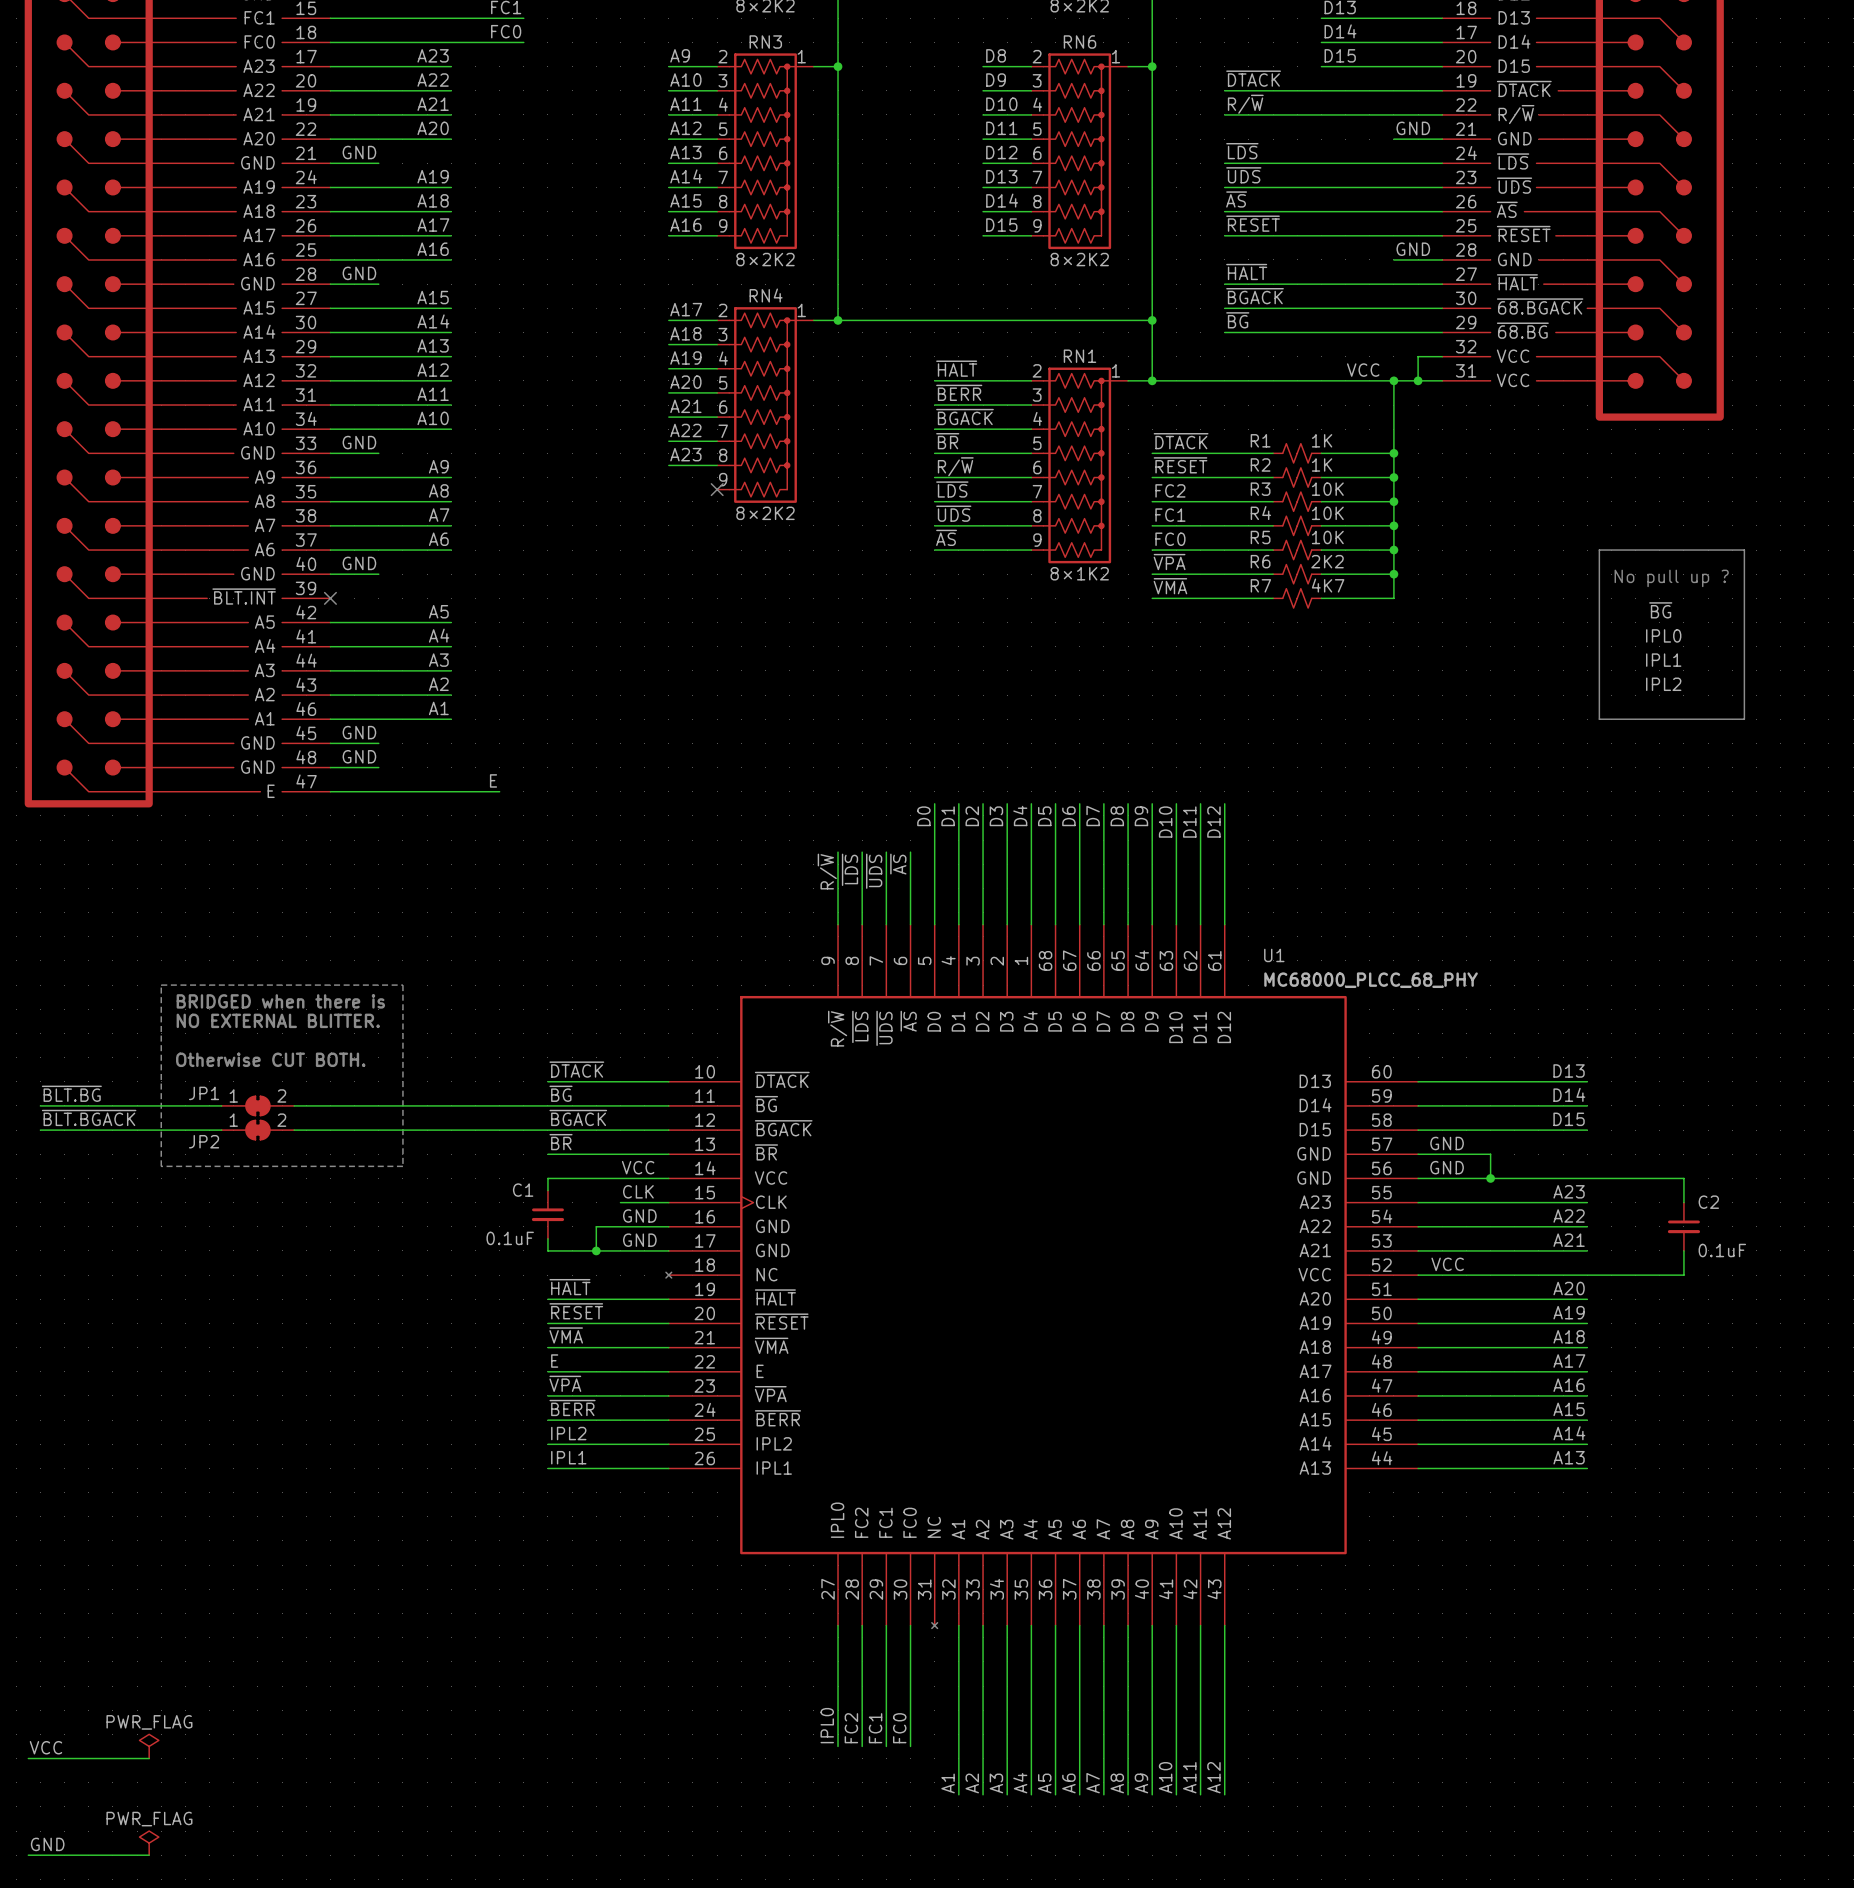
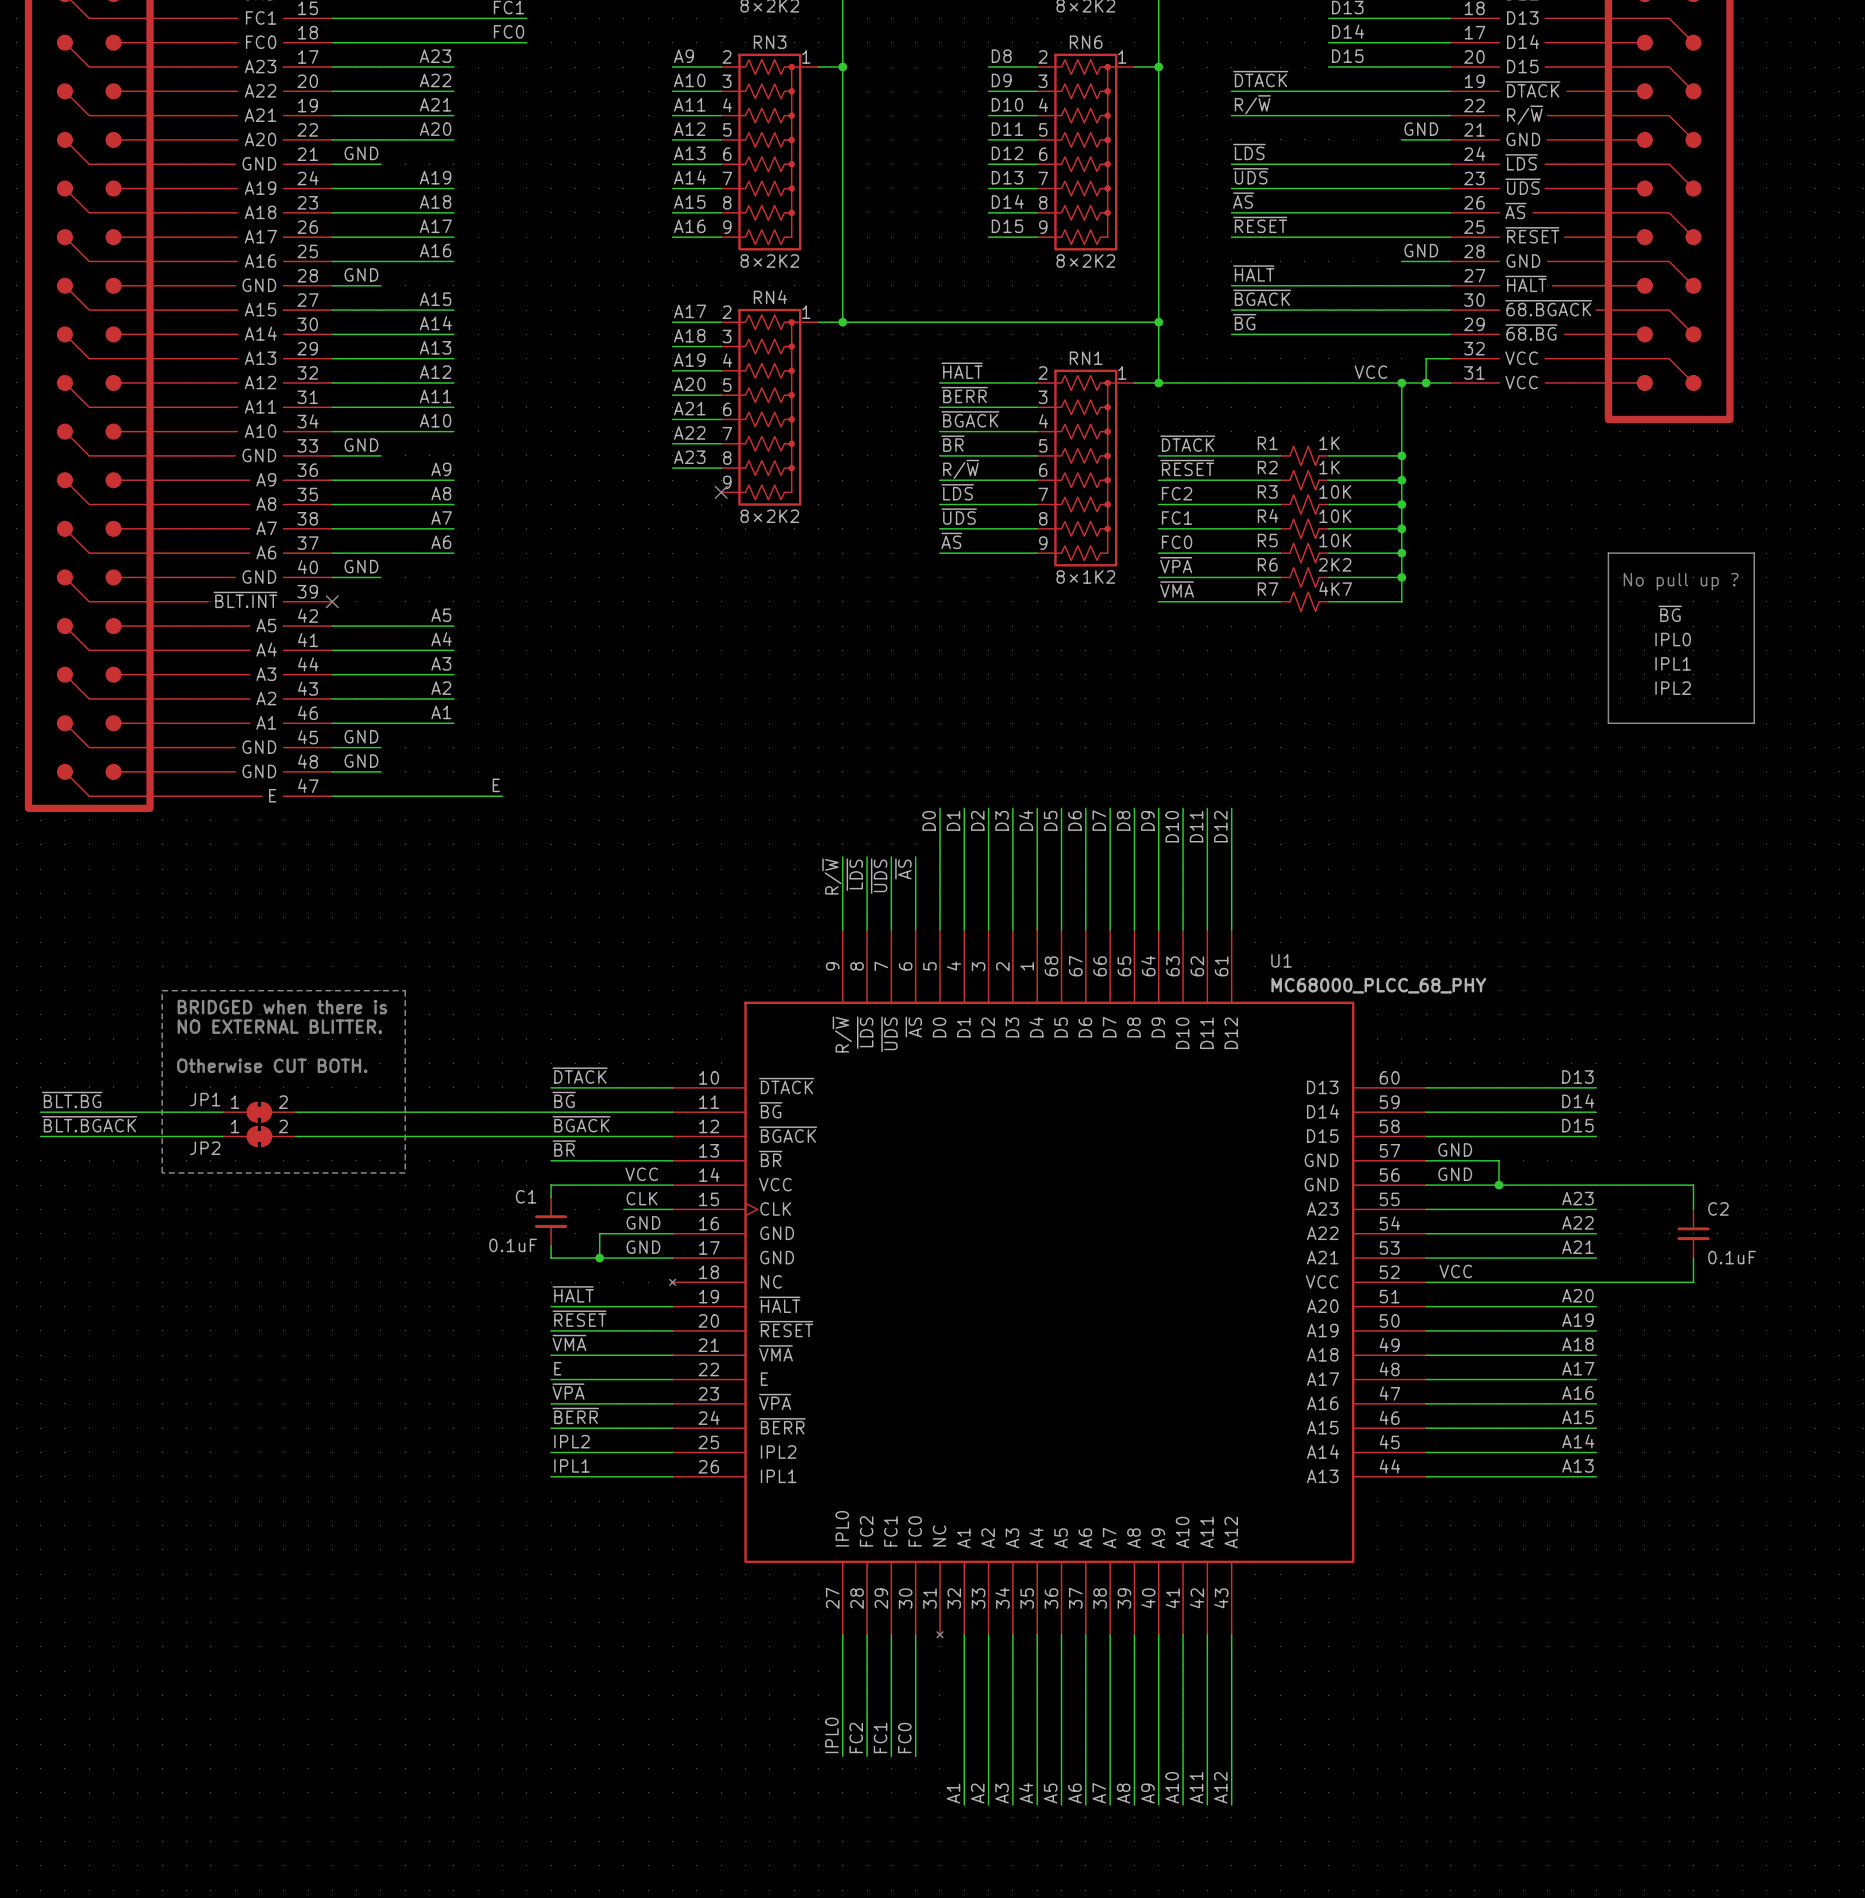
power symbol: PWR_FLAG (149, 1746) -> none
label: VCC (45, 1747) -> none
wire: (28, 1758) (149, 1758) -> none
power symbol: PWR_FLAG (149, 1843) -> none
label: GND (47, 1844) -> none
wire: (28, 1855) (149, 1855) -> none

